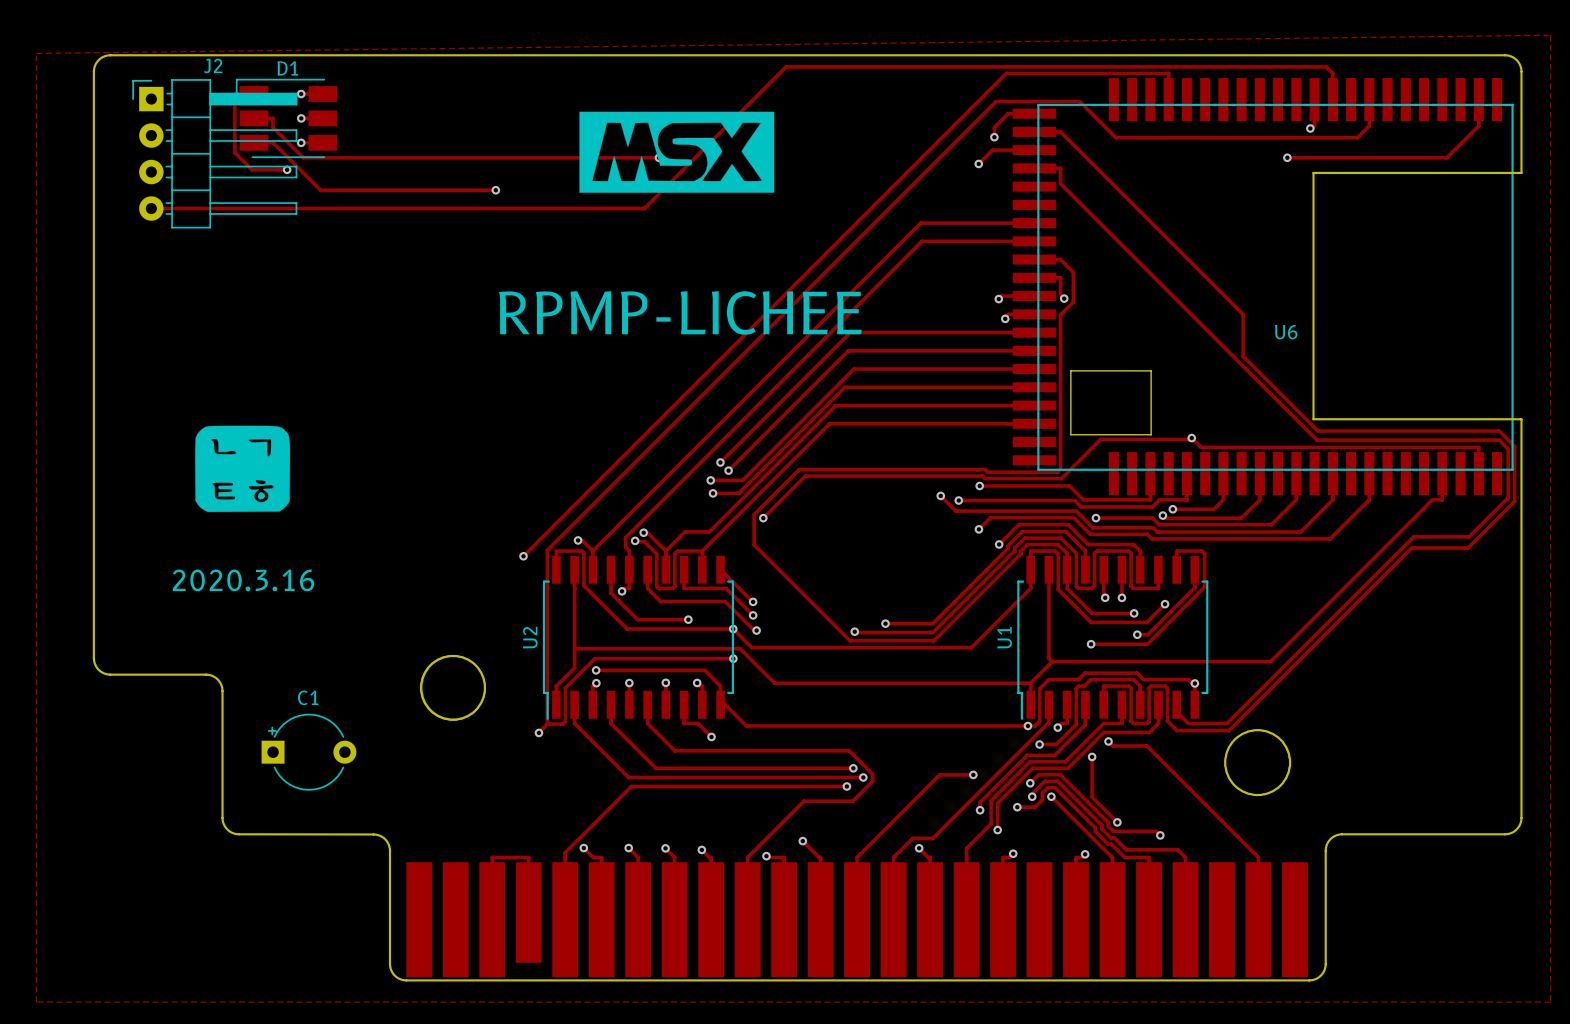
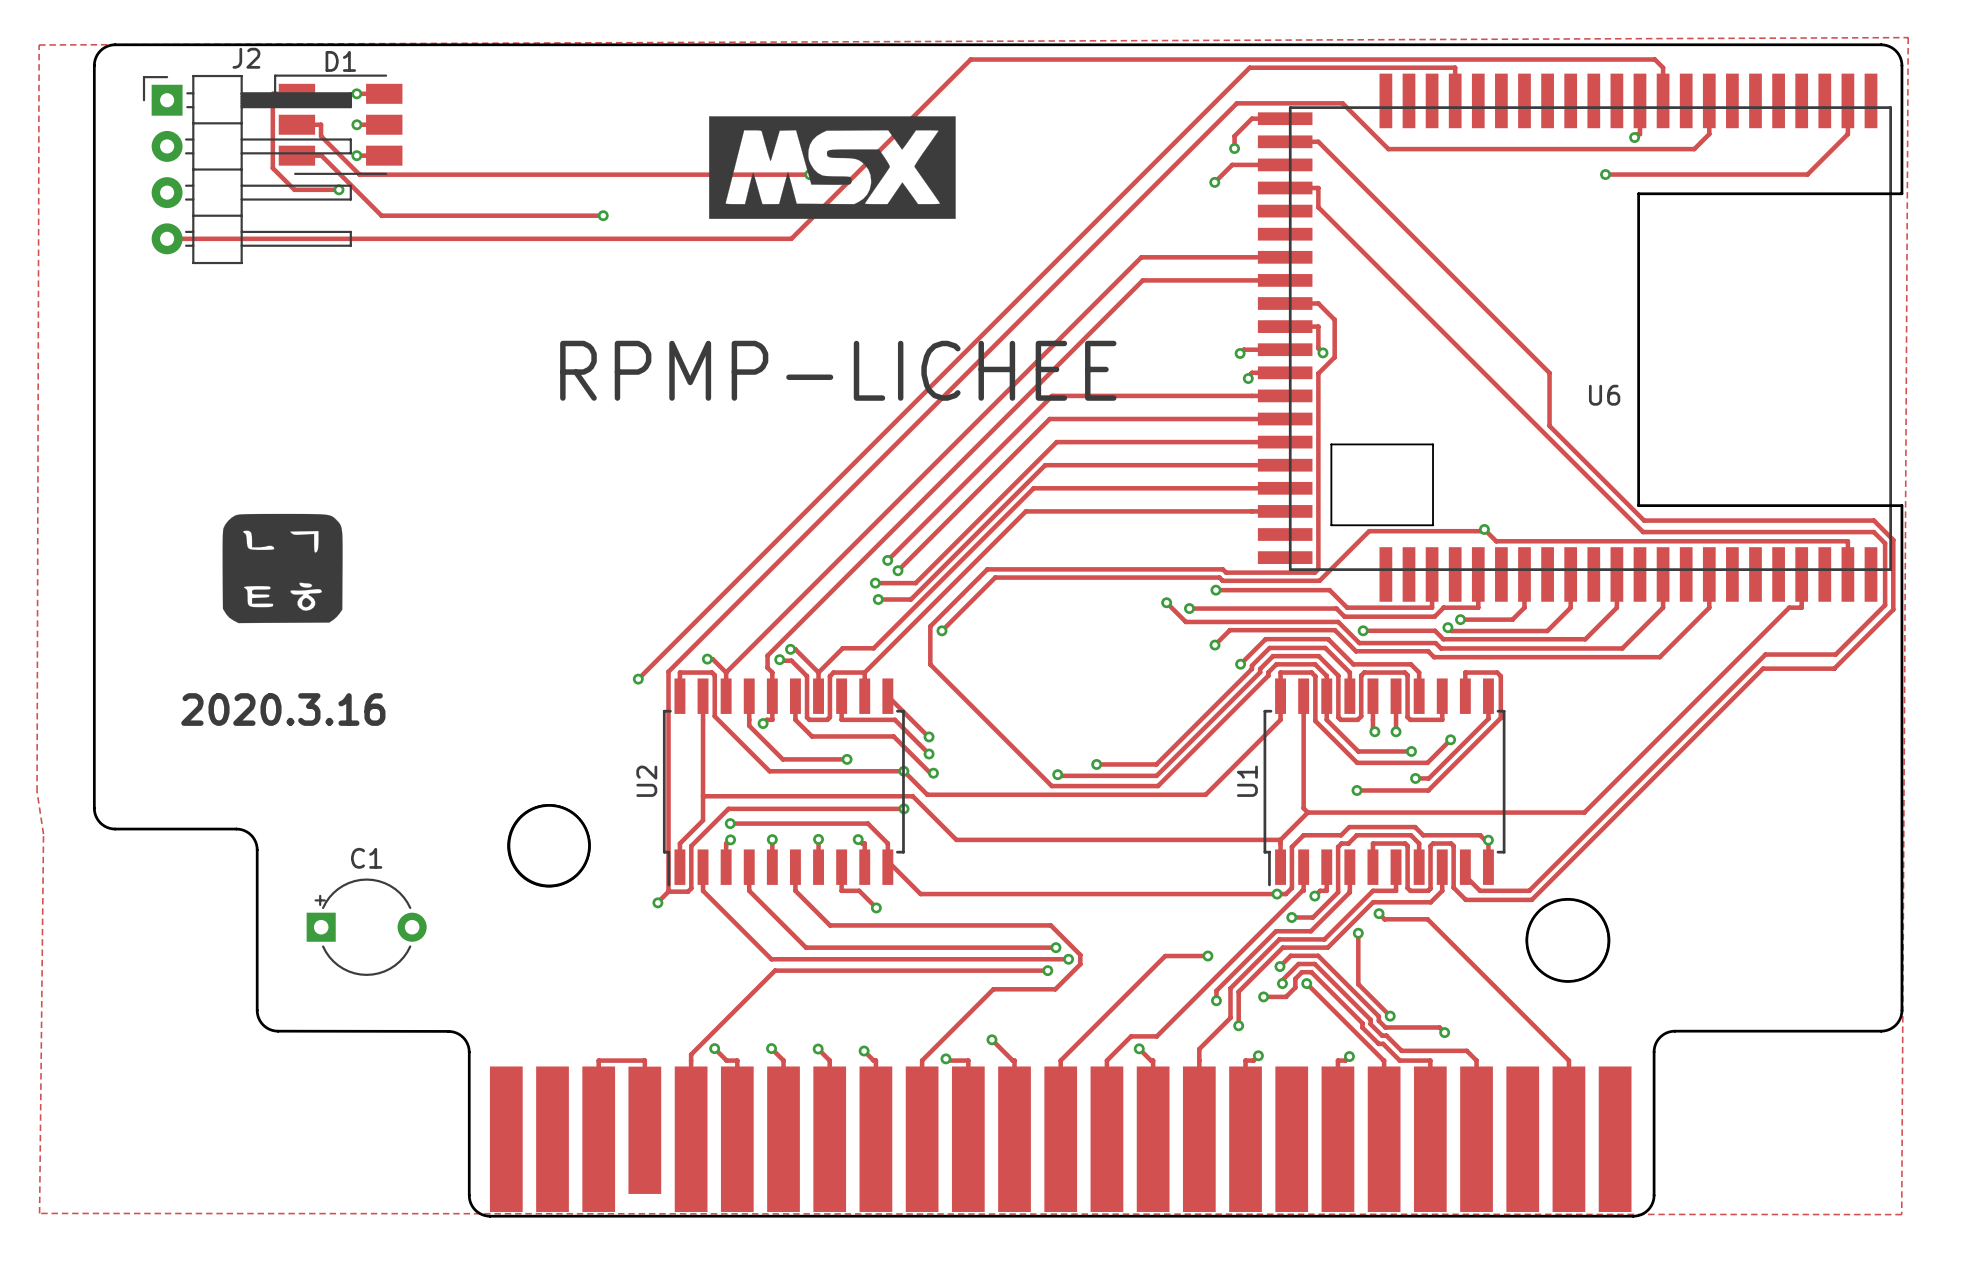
zone outline: (1550, 35) (36, 53) (36, 1002) (1550, 1002) (1550, 35) -> (1908, 37) (39, 45) (37, 791) (43, 834) (39, 1213) (1901, 1214) (1908, 37)

